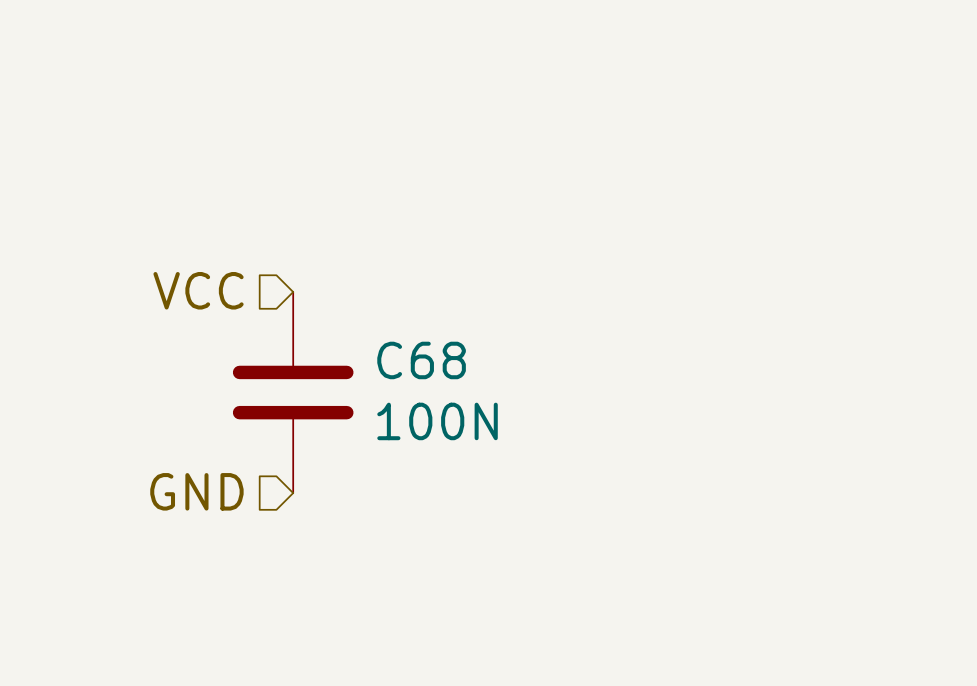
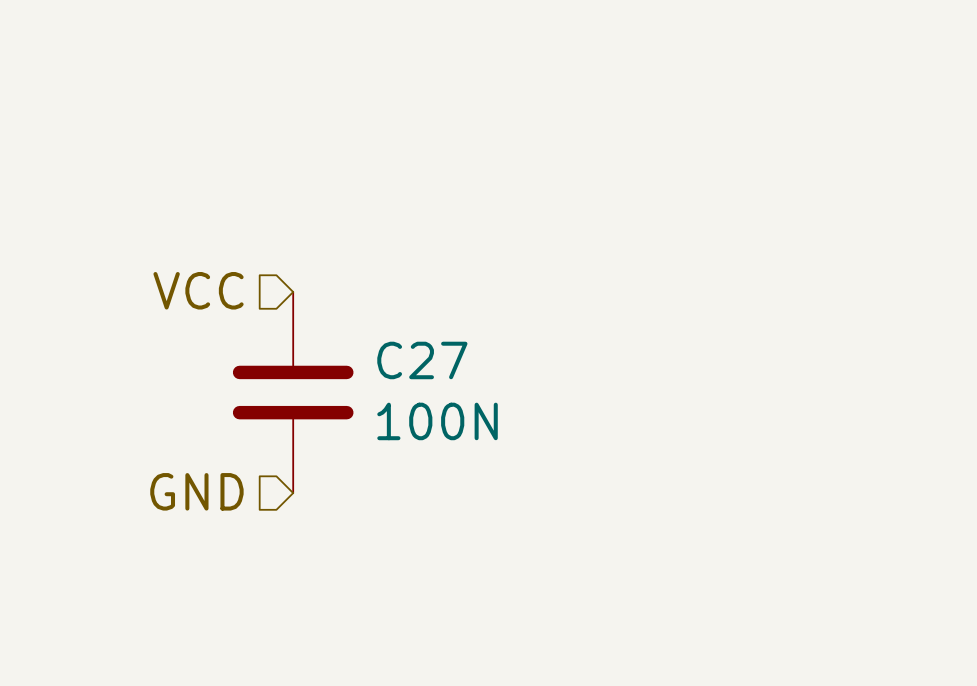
C68 name: C68 (421, 360) -> C27 (422, 360)

